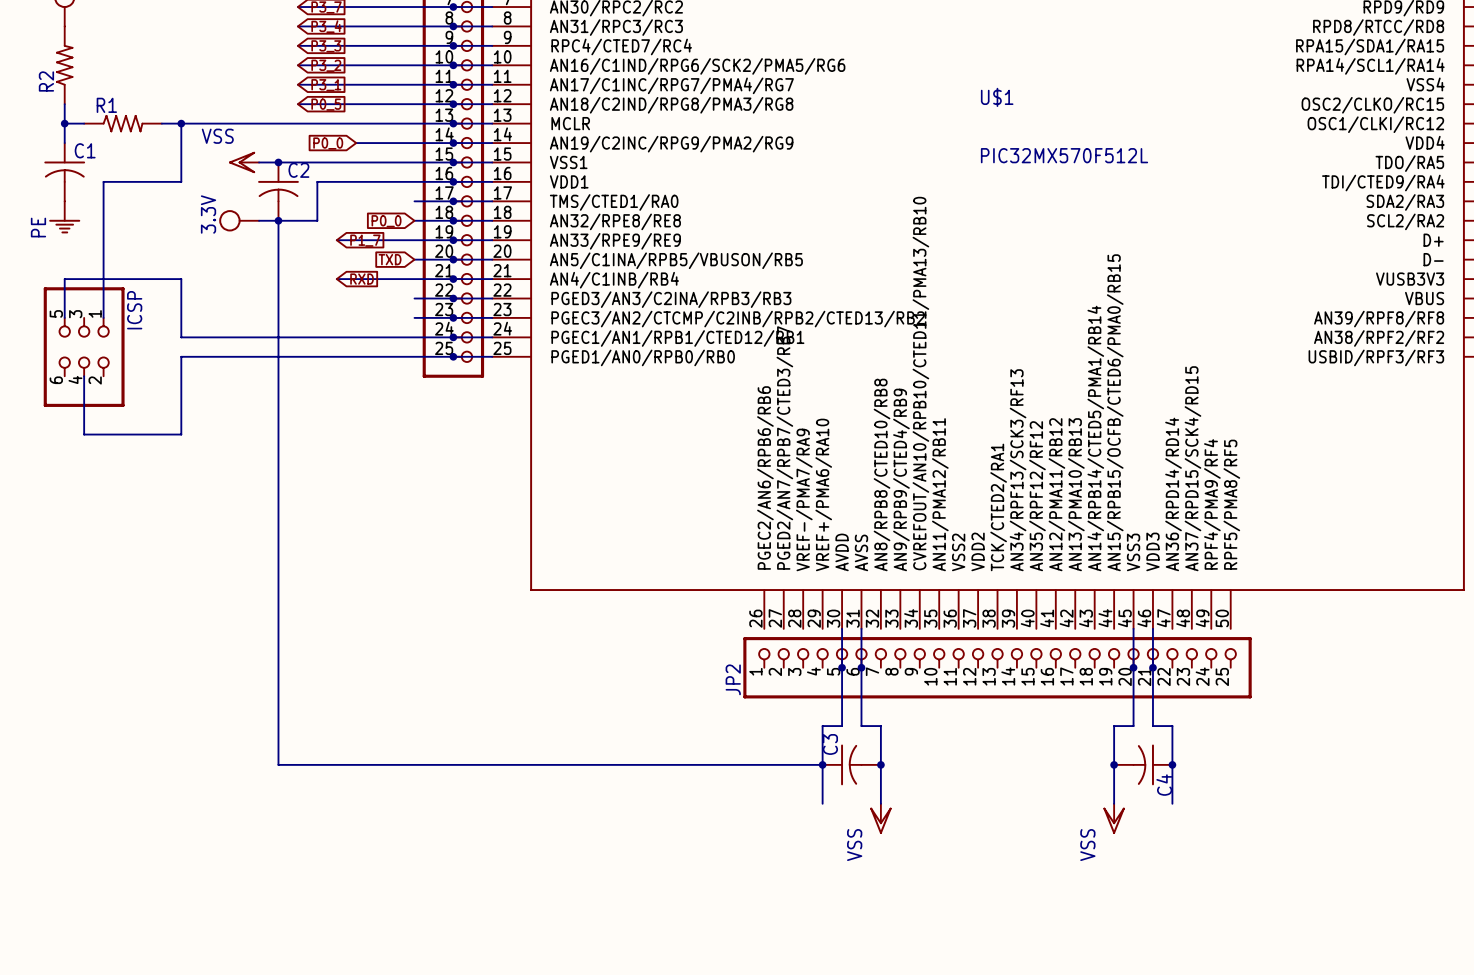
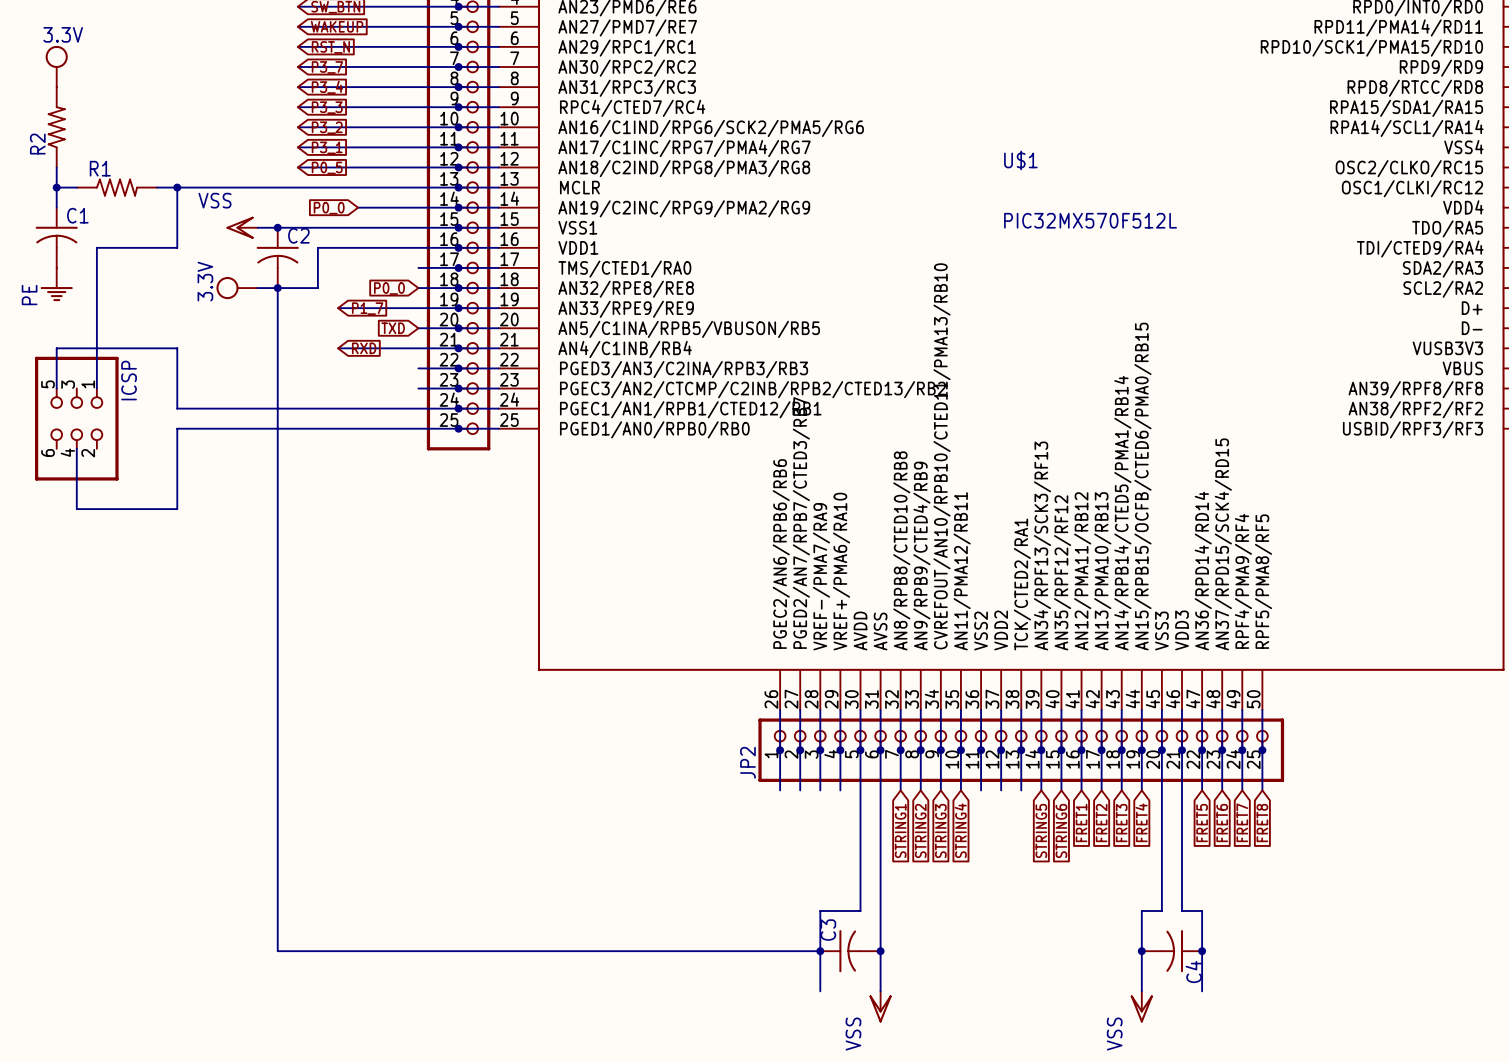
wire: none -> (780, 710) (780, 790)
wire: none -> (800, 710) (800, 790)
wire: none -> (820, 710) (820, 790)
wire: none -> (840, 710) (840, 790)
wire: none -> (900, 710) (900, 790)
wire: none -> (920, 710) (920, 790)
wire: none -> (940, 710) (940, 790)
wire: none -> (960, 710) (960, 790)
wire: none -> (981, 710) (981, 790)
wire: none -> (1001, 710) (1001, 790)
wire: none -> (1021, 710) (1021, 790)
wire: none -> (1041, 710) (1041, 790)
wire: none -> (1061, 710) (1061, 790)
wire: none -> (1081, 710) (1081, 790)
wire: none -> (1101, 710) (1101, 790)
wire: none -> (1121, 710) (1121, 790)
wire: none -> (1141, 710) (1141, 790)
wire: none -> (1202, 710) (1202, 790)
wire: none -> (1222, 710) (1222, 790)
wire: none -> (1242, 710) (1242, 790)
wire: none -> (1262, 710) (1262, 790)
junction: none -> (780, 750)
junction: none -> (800, 750)
junction: none -> (820, 750)
junction: none -> (840, 750)
junction: none -> (900, 750)
junction: none -> (920, 750)
junction: none -> (940, 750)
junction: none -> (960, 750)
junction: none -> (981, 750)
junction: none -> (1001, 750)
junction: none -> (1021, 750)
junction: none -> (1041, 750)
junction: none -> (1061, 750)
junction: none -> (1081, 750)
junction: none -> (1101, 750)
junction: none -> (1121, 750)
junction: none -> (1141, 750)
junction: none -> (1202, 750)
junction: none -> (1222, 750)
junction: none -> (1242, 750)
junction: none -> (1262, 750)
wire: (842, 726) (822, 726) (822, 803) -> (860, 810) (860, 910) (820, 910) (820, 991)
wire: (861, 726) (880, 726) (880, 803) -> (880, 810) (880, 991)
wire: (1133, 726) (1114, 726) (1114, 803) -> (1161, 810) (1161, 910) (1141, 910) (1141, 991)
wire: (1152, 726) (1172, 726) (1172, 803) -> (1182, 810) (1182, 910) (1202, 910) (1202, 991)
global label: none -> FRET4 (1141, 822)
global label: none -> FRET7 (1242, 822)
global label: none -> FRET1 (1081, 823)
global label: none -> FRET2 (1101, 823)
global label: none -> FRET3 (1121, 823)
global label: none -> FRET5 (1202, 823)
global label: none -> FRET6 (1222, 823)
global label: none -> FRET8 (1262, 823)
global label: none -> STRING1 (900, 830)
global label: none -> STRING2 (920, 830)
global label: none -> STRING3 (940, 830)
global label: none -> STRING4 (960, 830)
global label: none -> STRING5 (1041, 830)
global label: none -> STRING6 (1061, 830)
wire: (278, 764) (822, 764) -> (277, 850) (277, 951) (820, 951)
junction: (822, 764) -> none
C3 position: (851, 764) -> (850, 951)
junction: (880, 764) -> none
junction: (1114, 764) -> none
C4 position: (1143, 764) -> (1171, 951)
junction: (1172, 764) -> none
power symbol position: VSS (880, 818) -> VSS (880, 1006)
power symbol position: VSS (1114, 818) -> VSS (1141, 1006)
junction: none -> (820, 951)
junction: none -> (880, 951)
junction: none -> (1141, 951)
junction: none -> (1202, 951)

